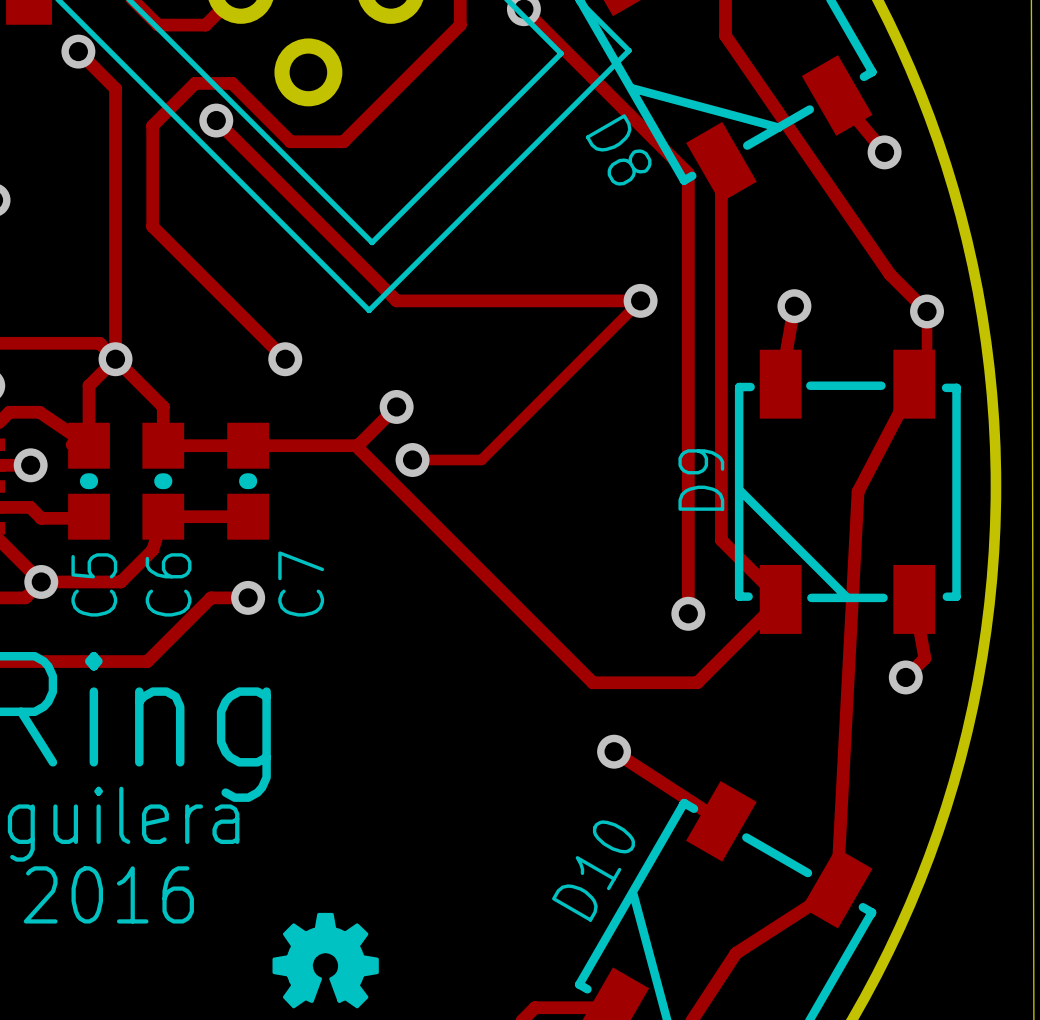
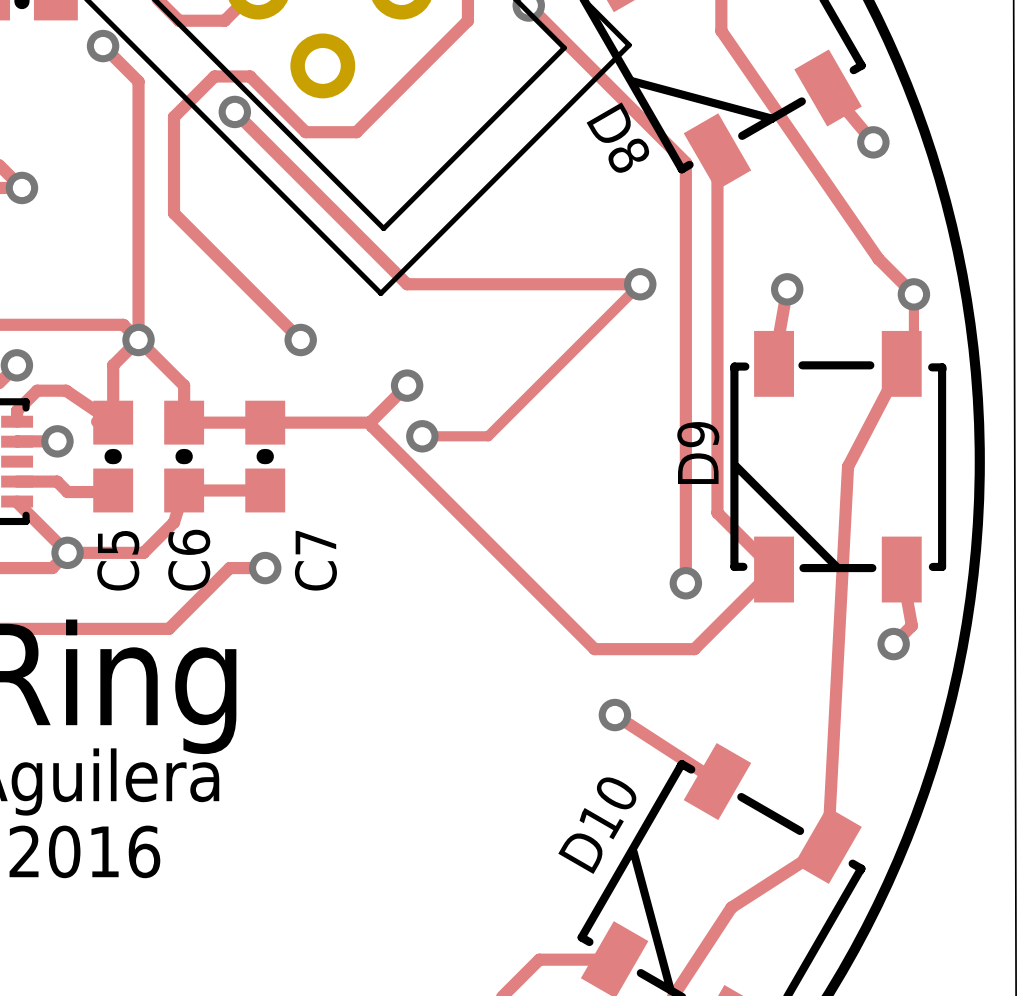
drawing: [272, 912, 379, 1009] -> none

